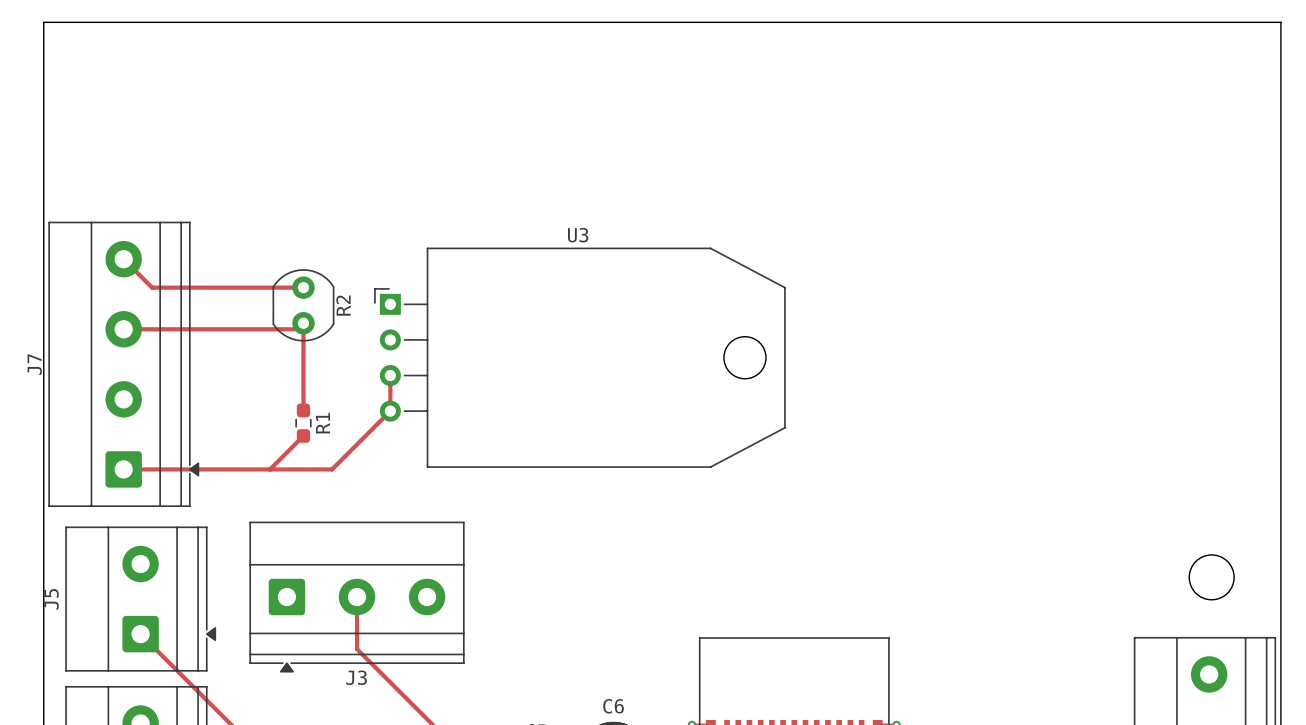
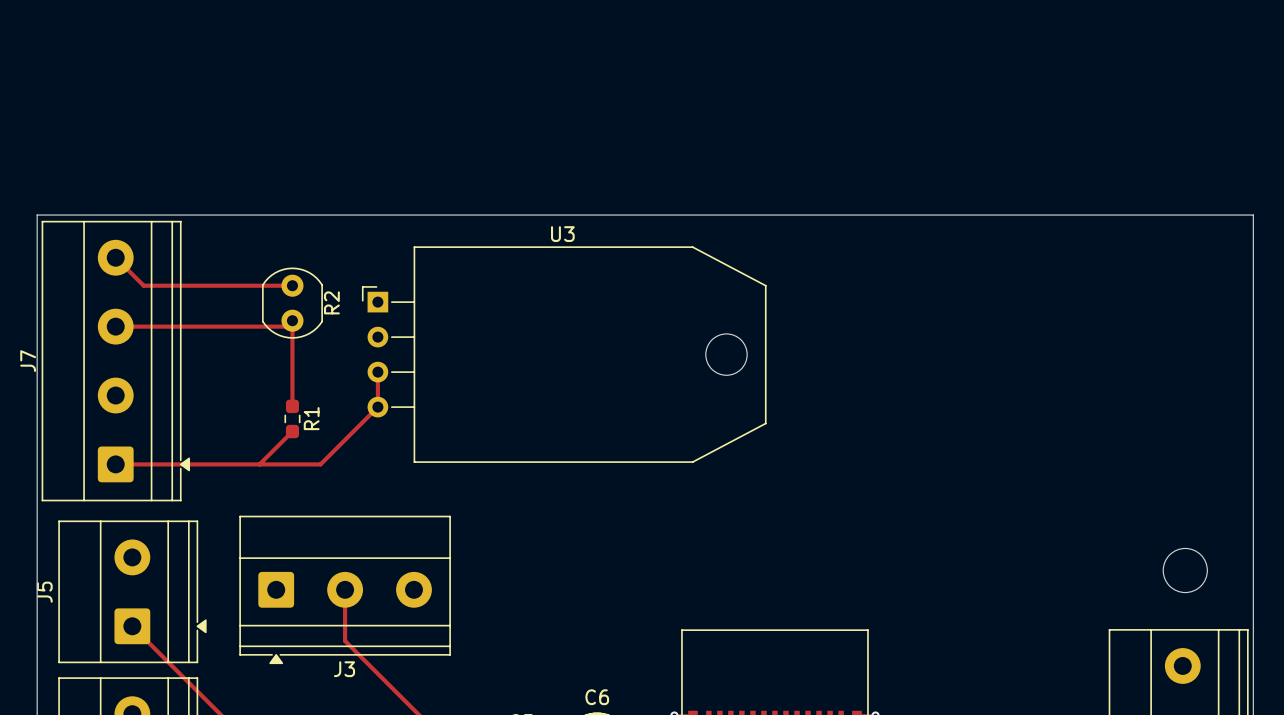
board edge: (43, 215) (43, 22) (1280, 22) (1280, 215) -> (37, 215) (1253, 215)

